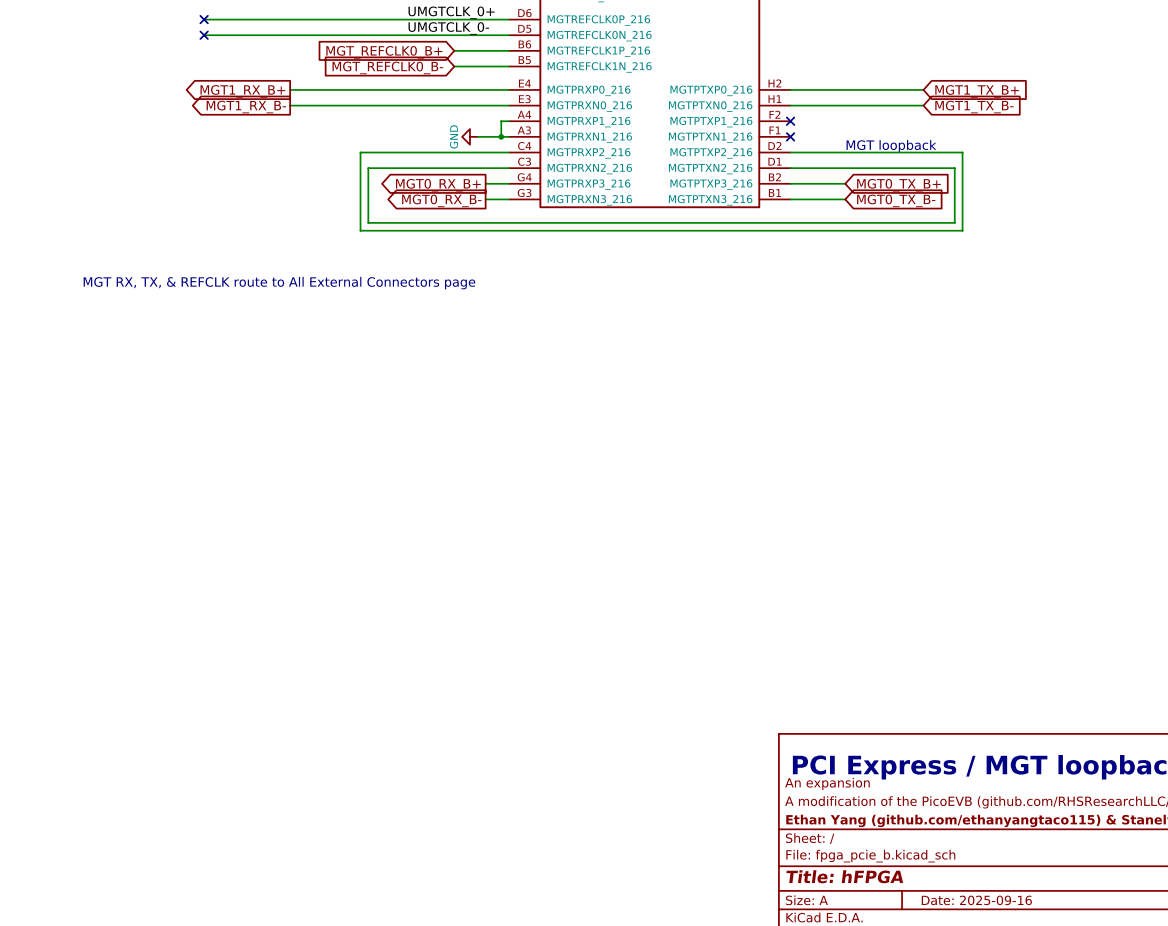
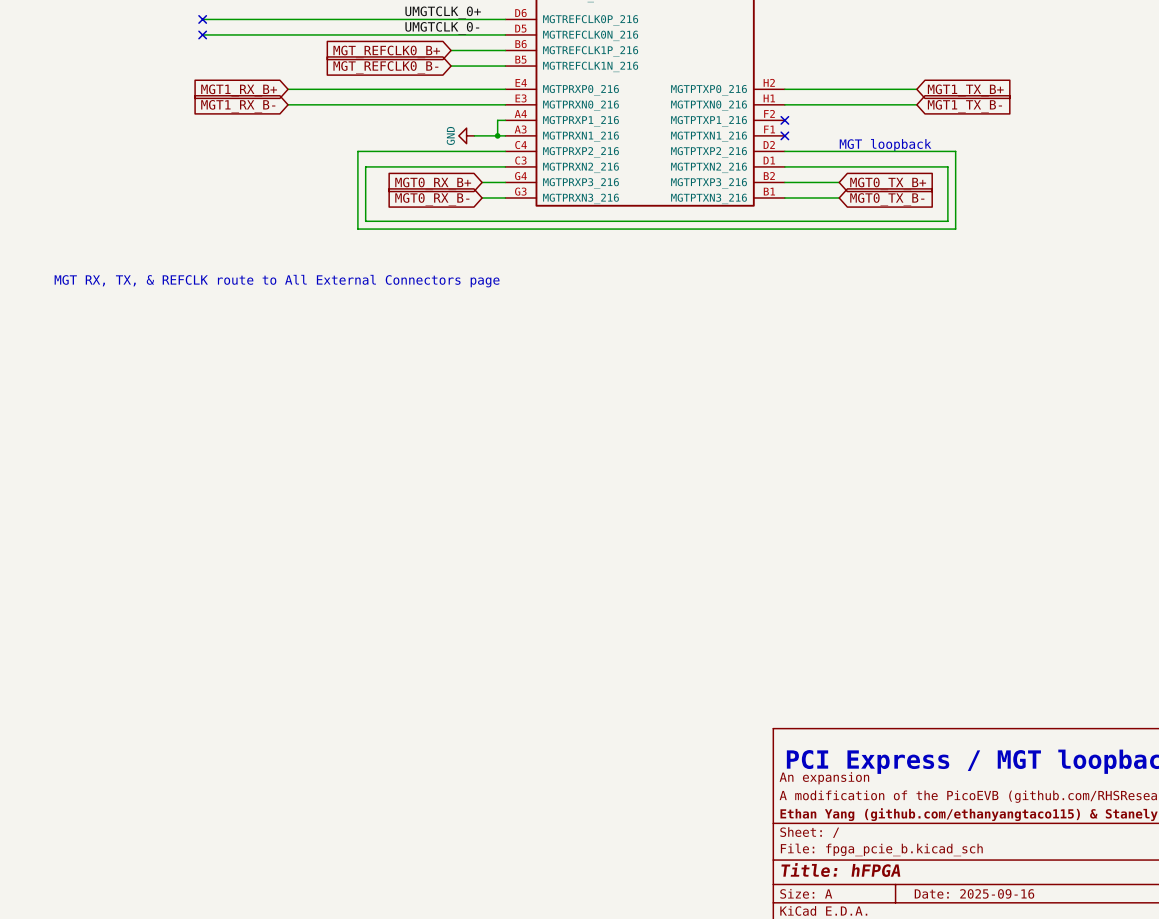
global label shape: output (242, 91) -> input (239, 90)
global label shape: output (246, 107) -> input (238, 106)
global label shape: output (438, 185) -> input (433, 183)
global label shape: output (441, 200) -> input (432, 199)

